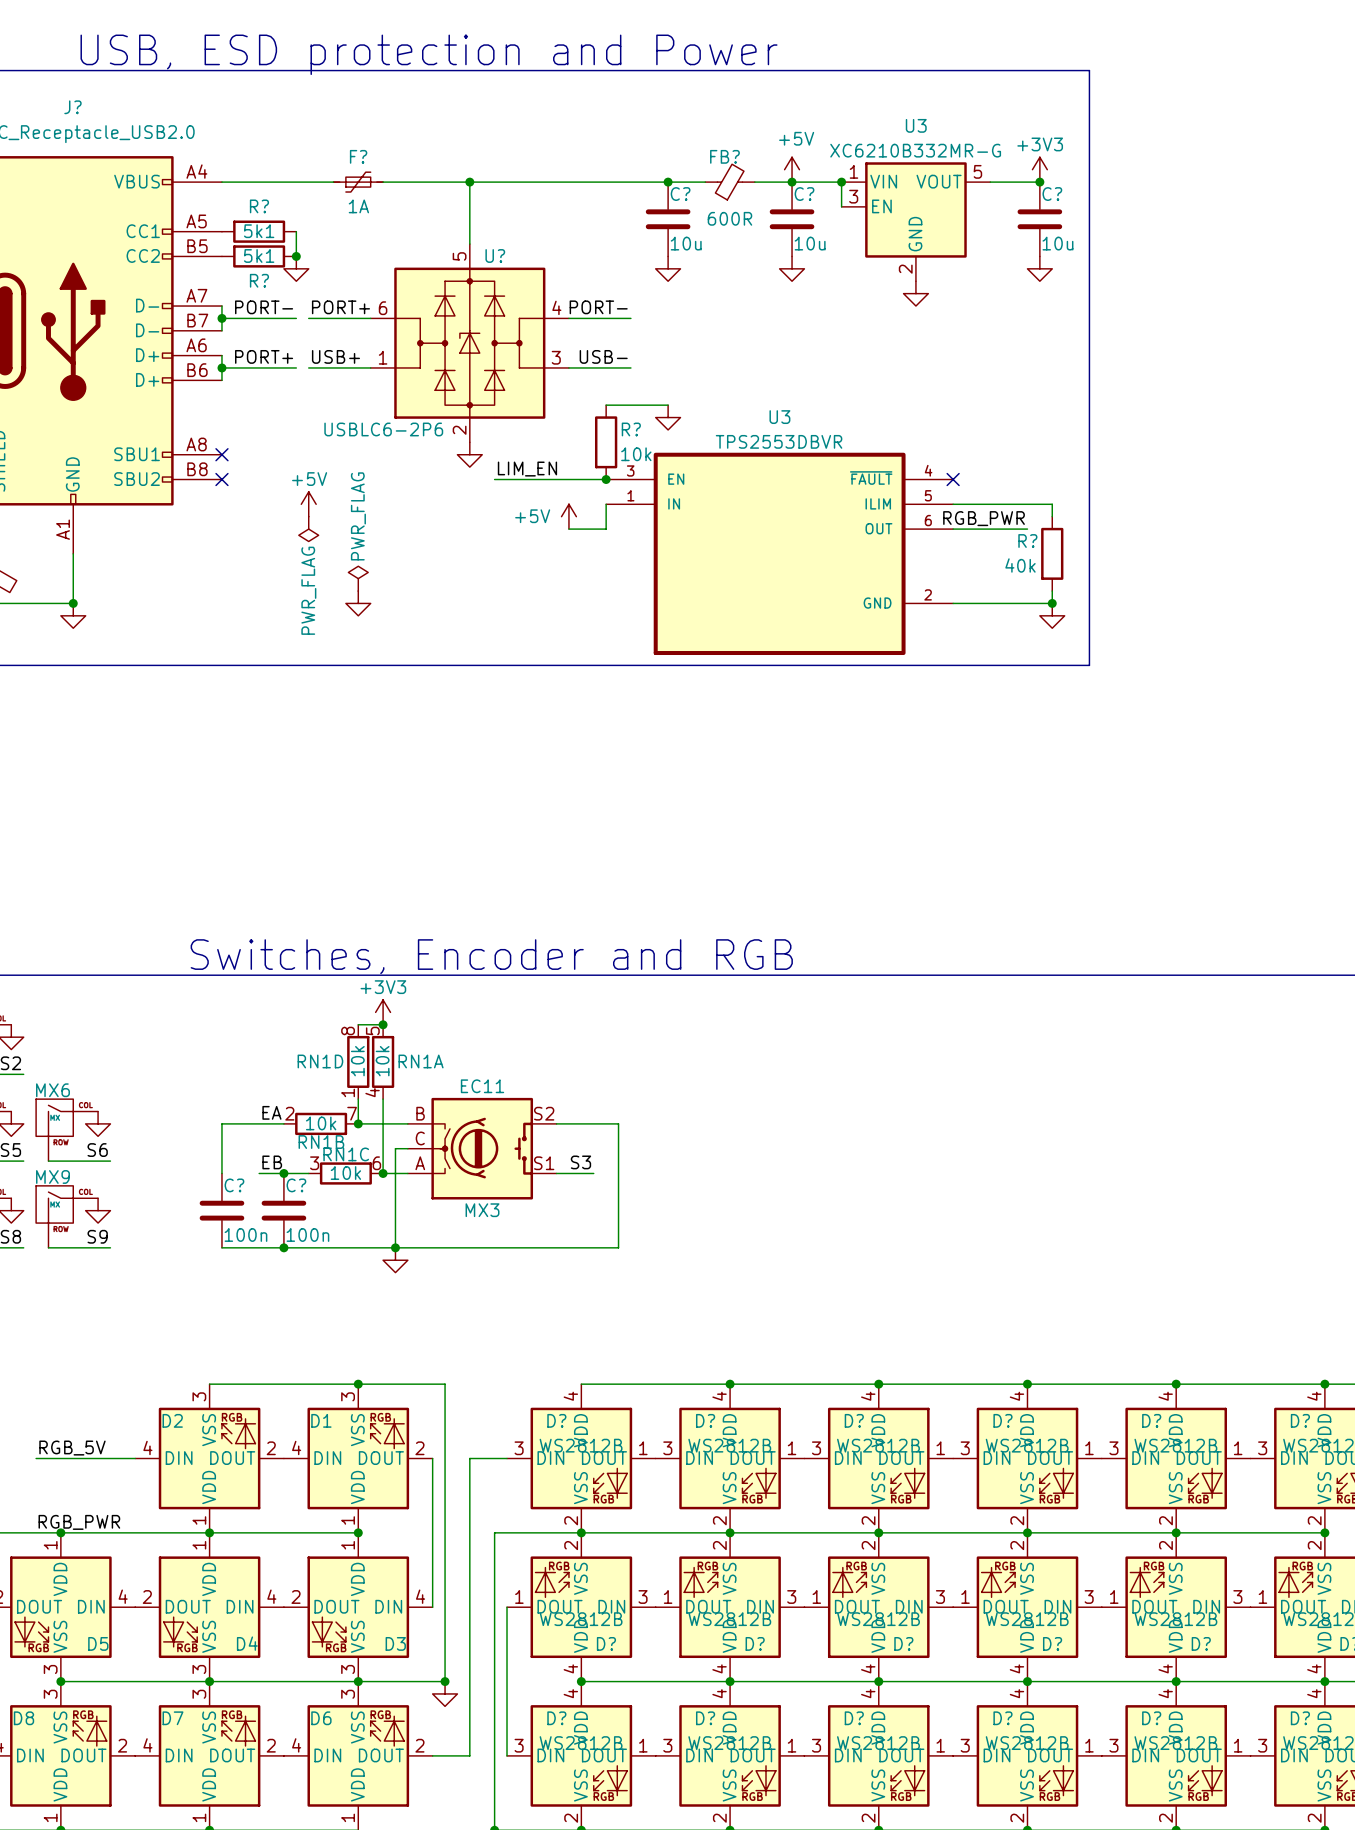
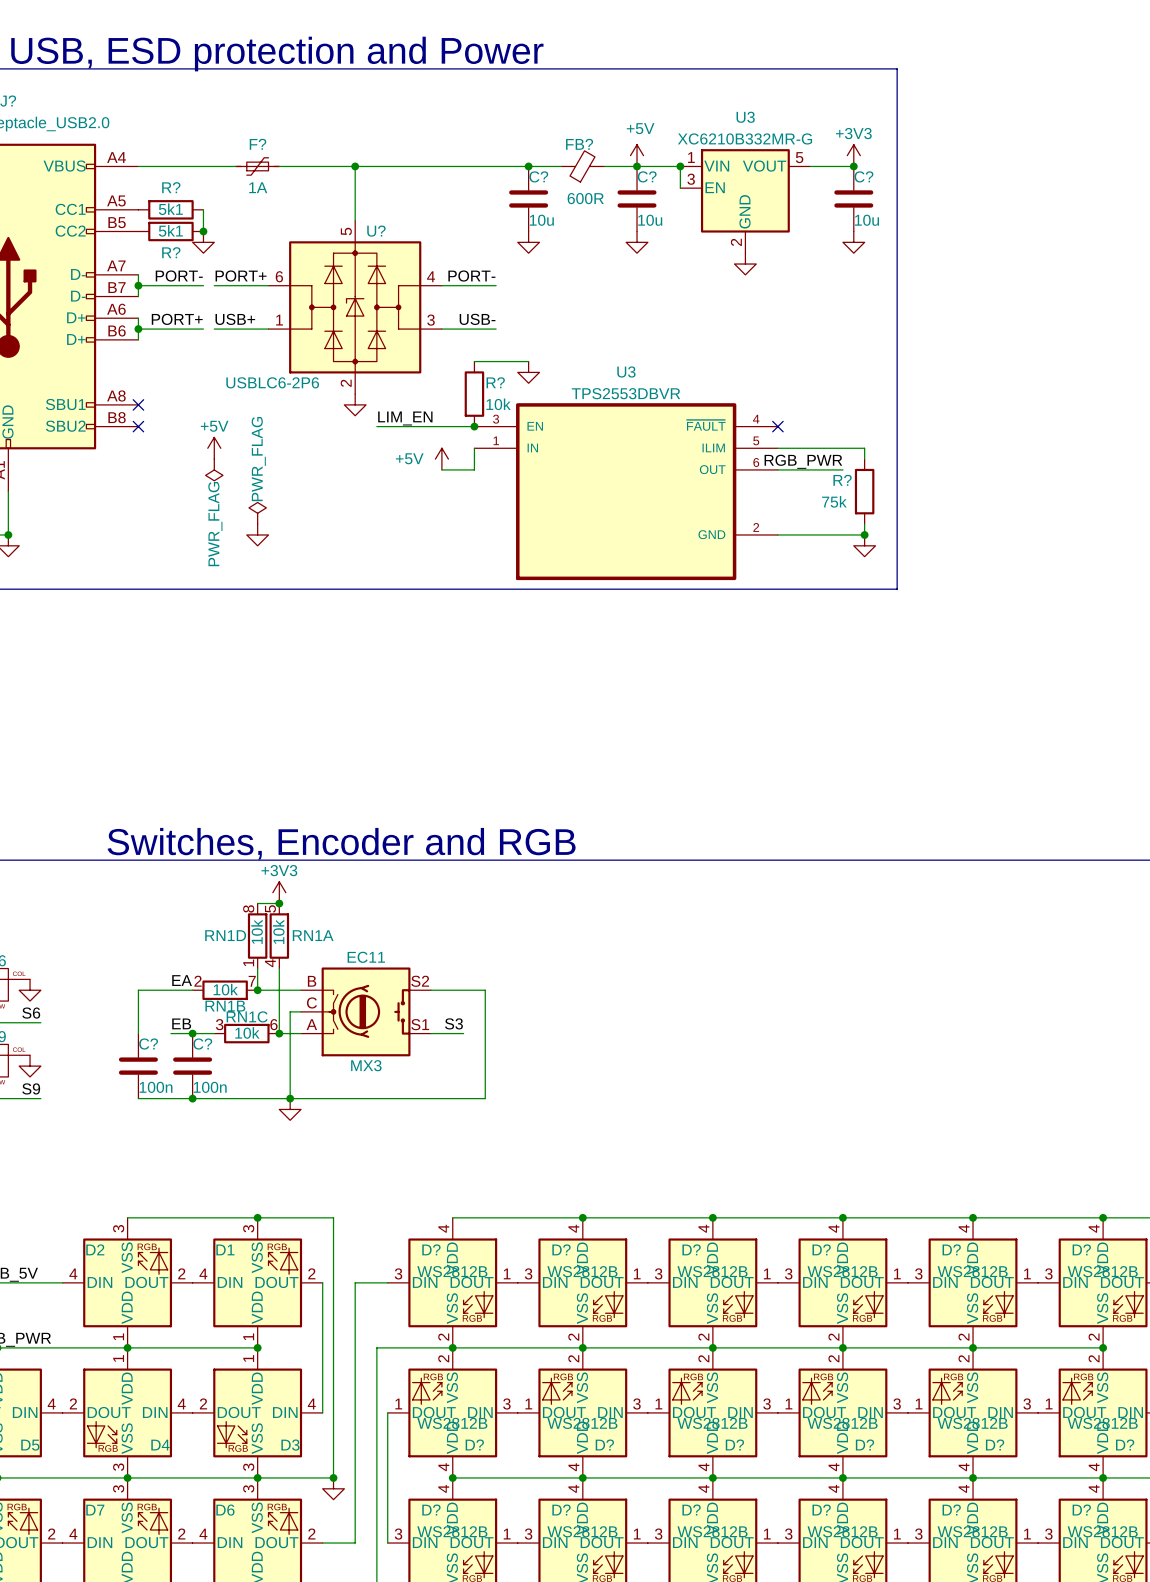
R? value: 40k (1020, 565) -> 75k (834, 501)

